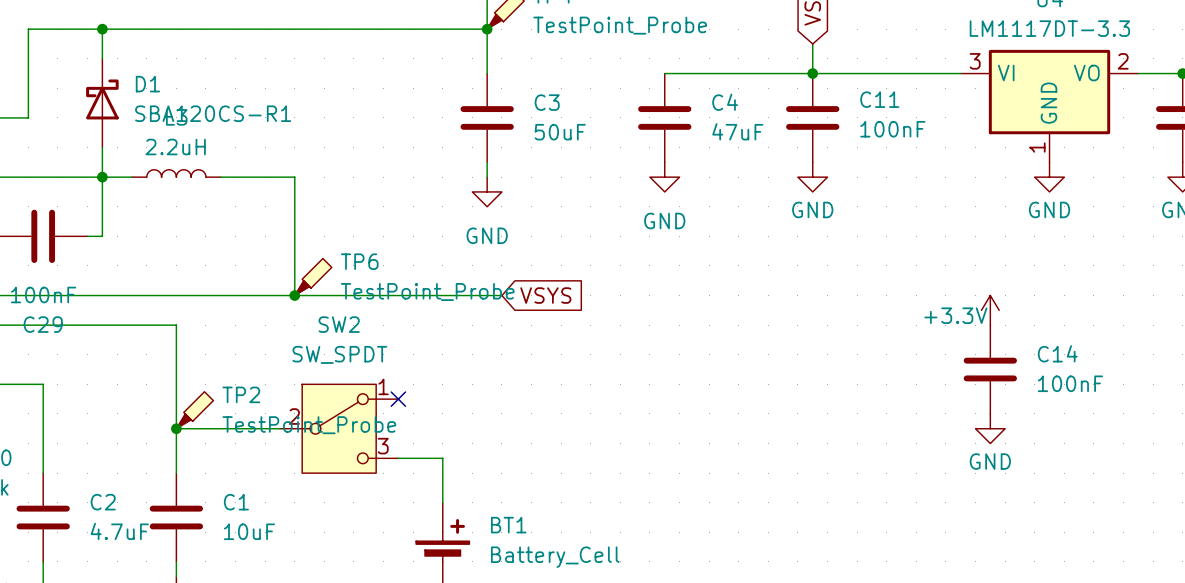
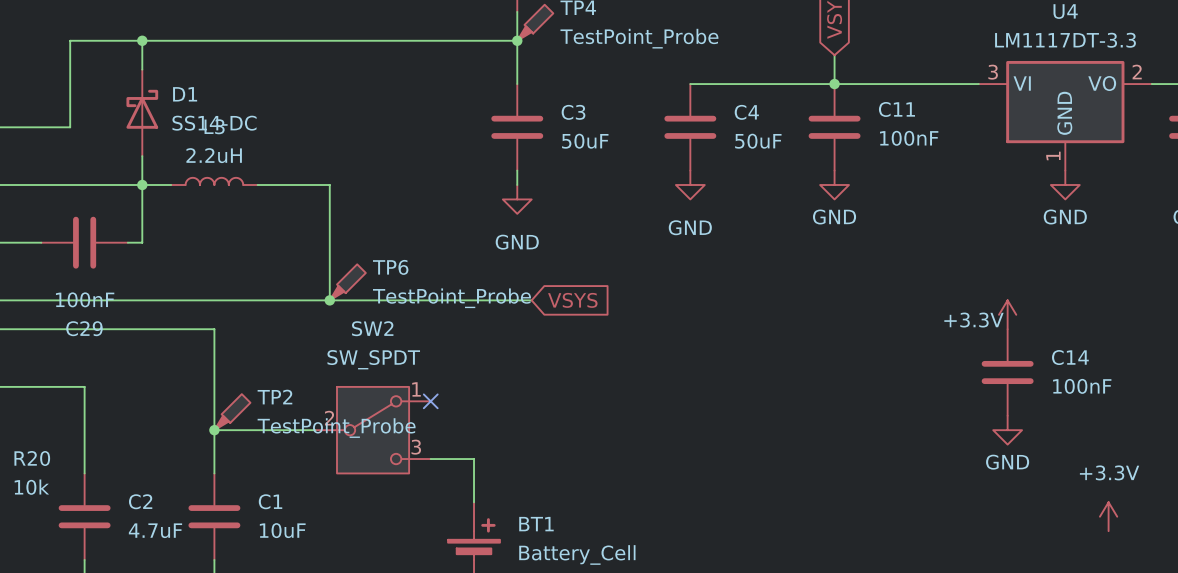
D1 value: SBA120CS-R1 (213, 113) -> SS14-DC (214, 123)
C4 value: 47uF (737, 131) -> 50uF (758, 141)
power symbol: none -> +3.3V (1108, 516)

